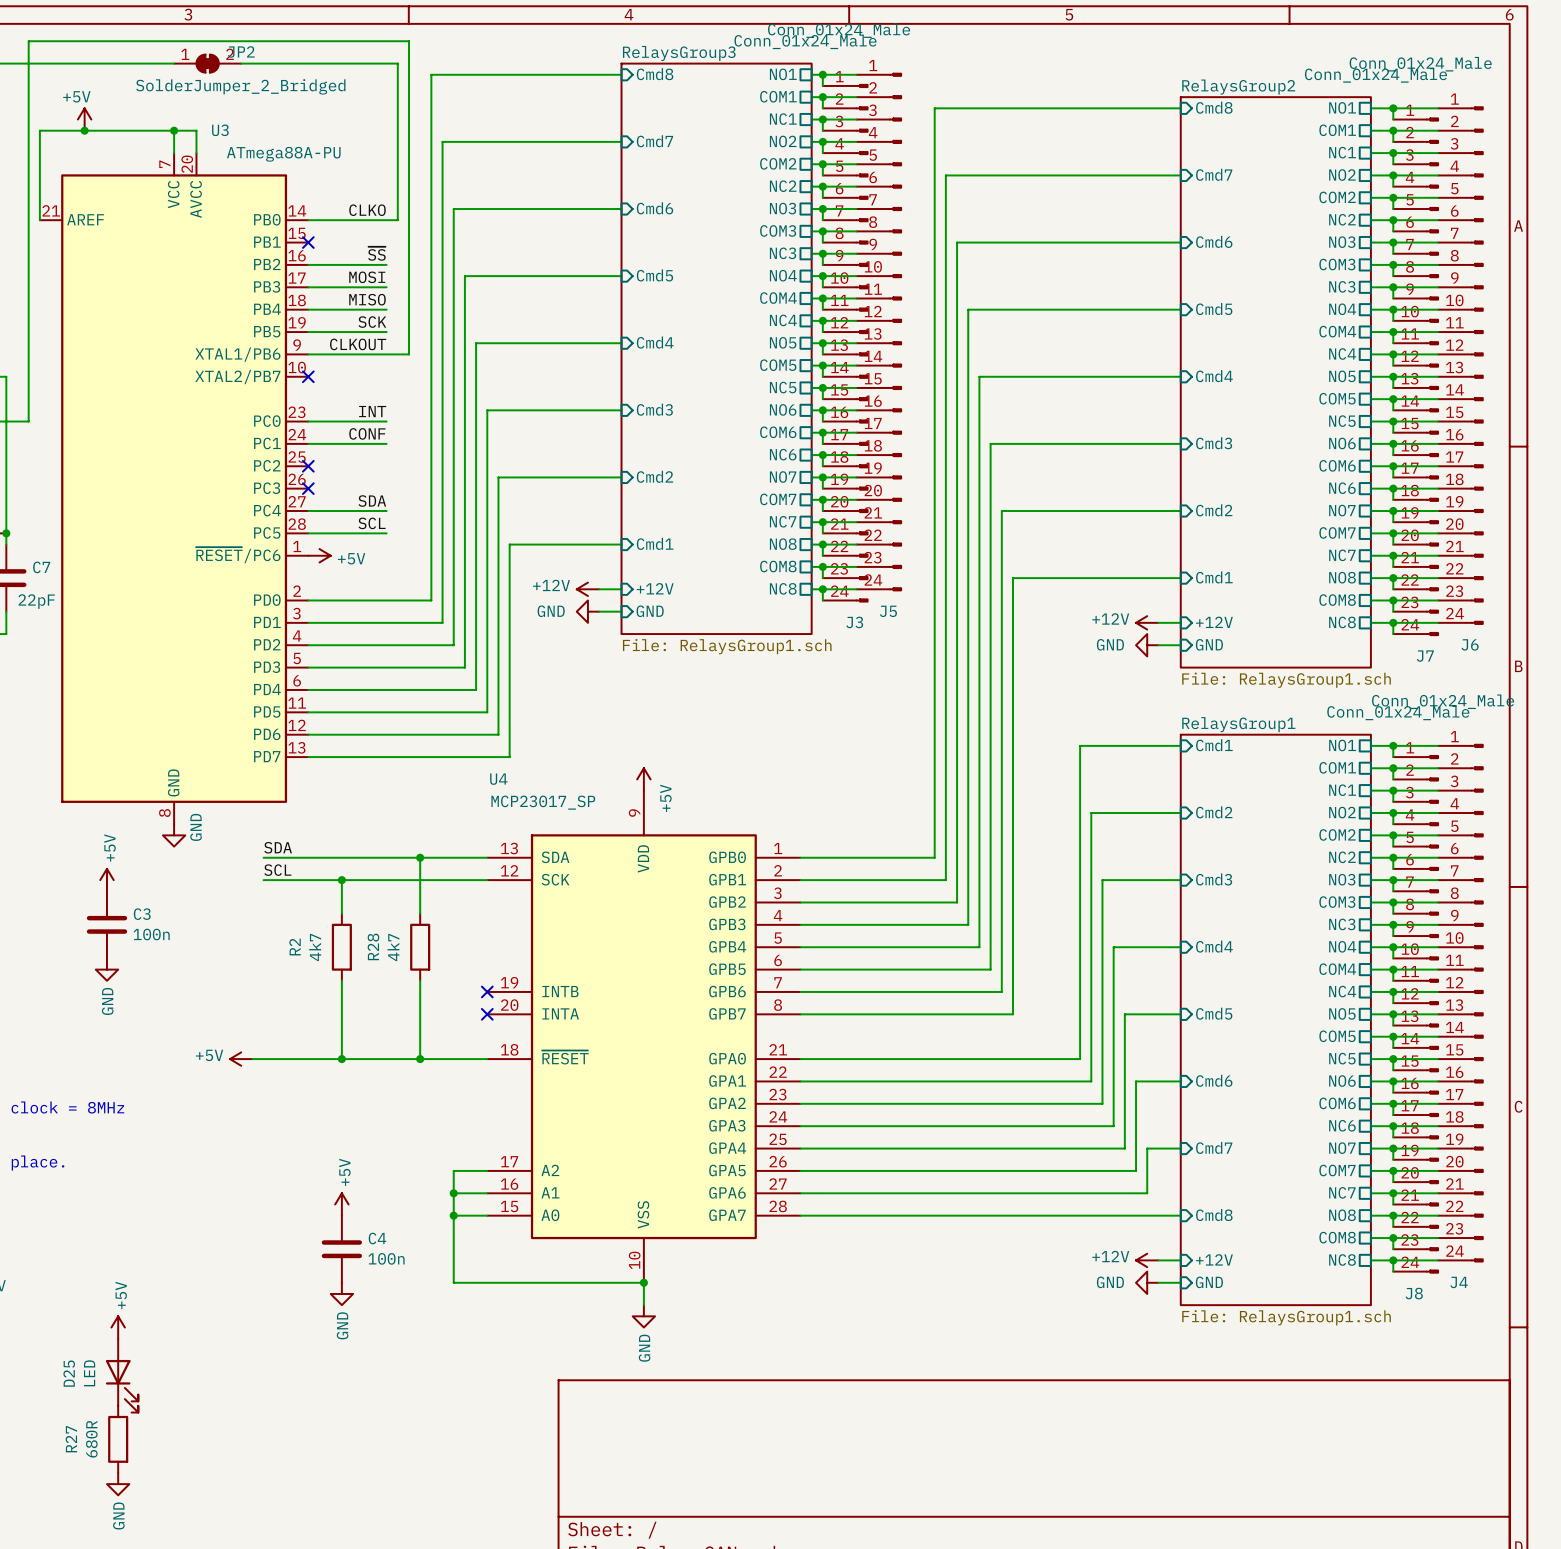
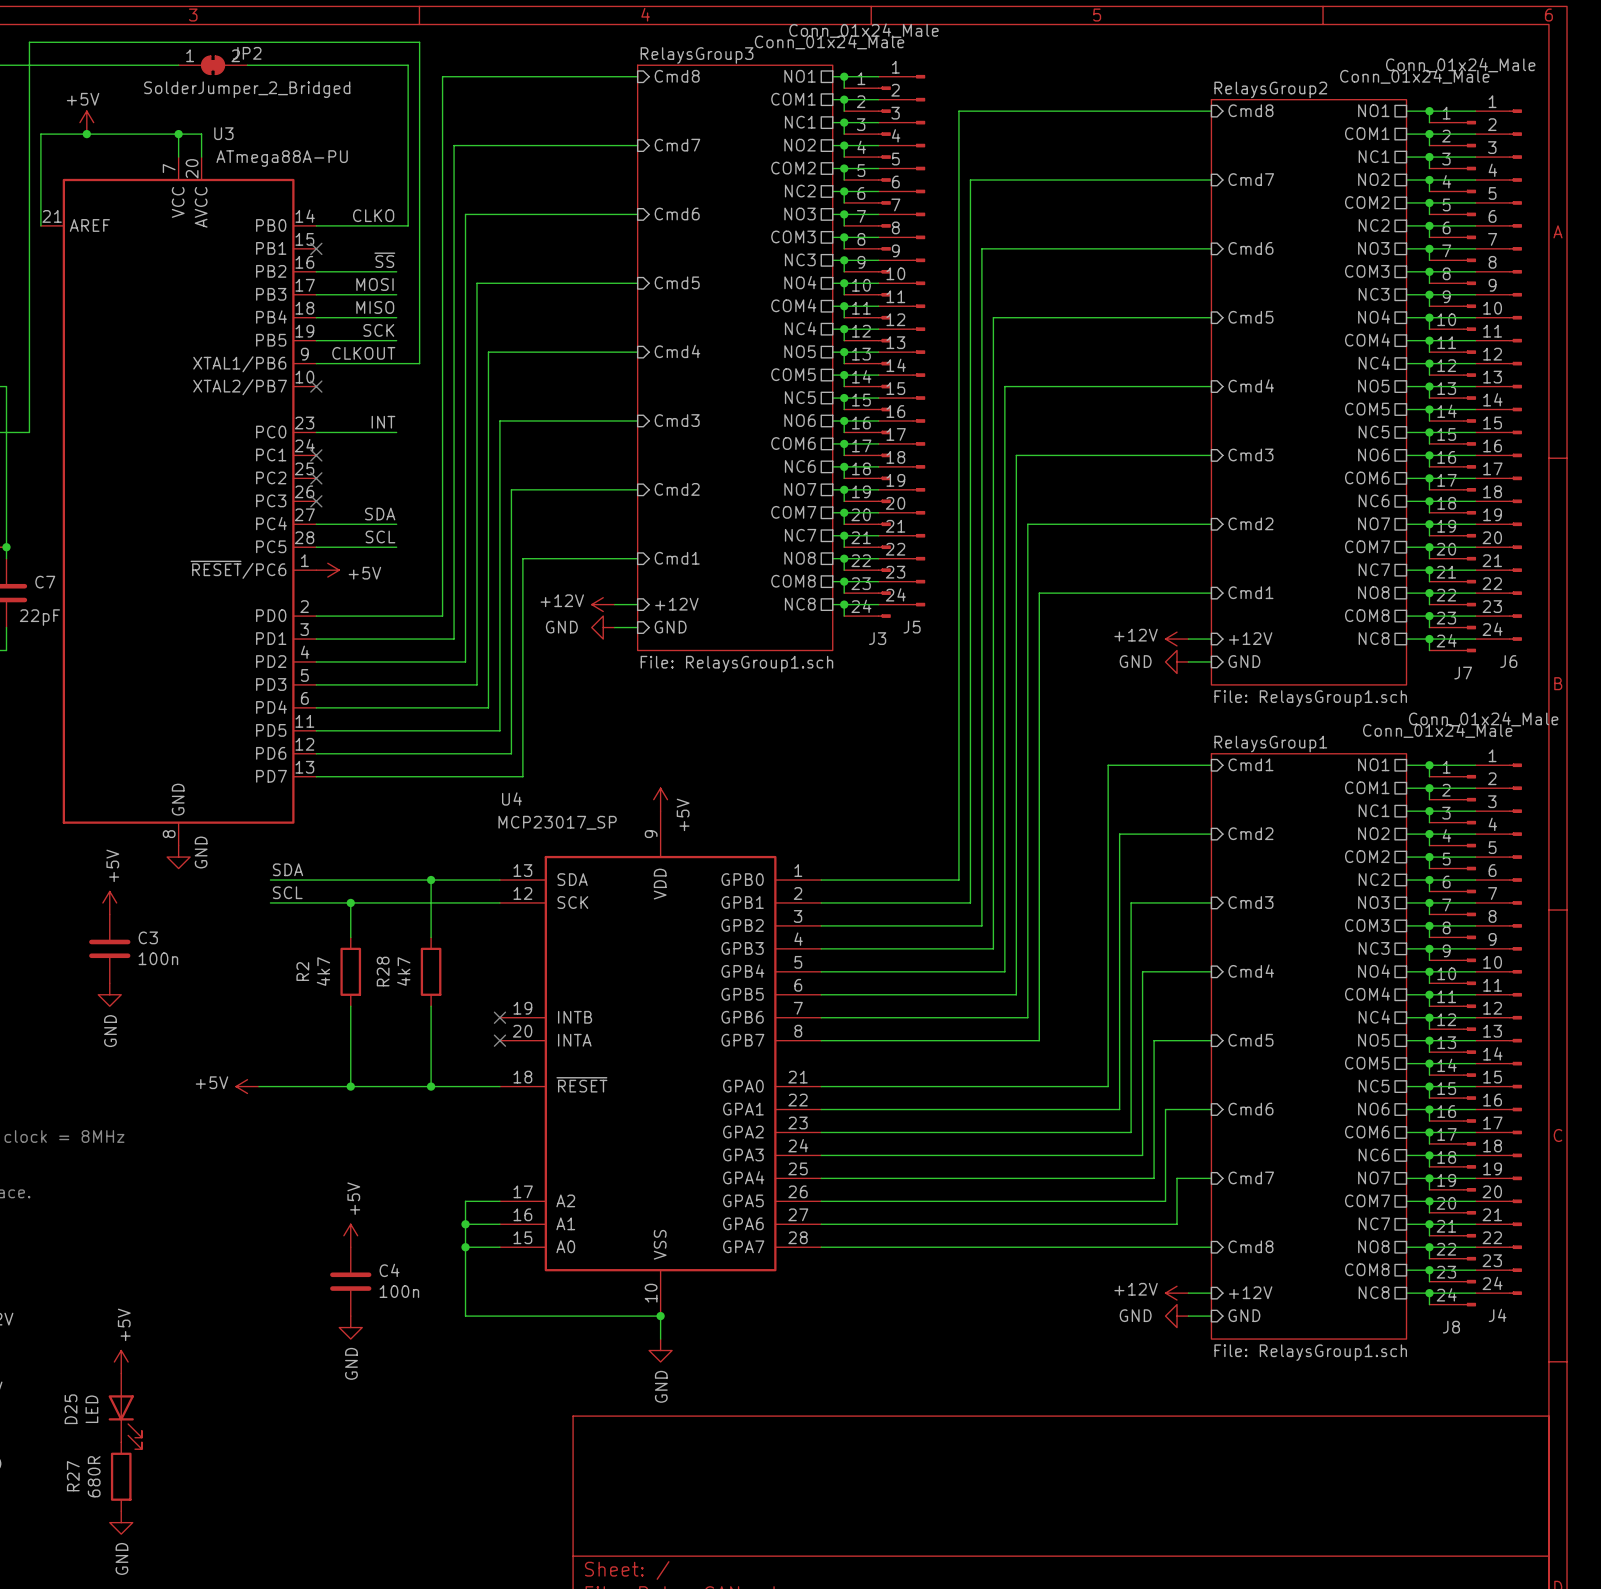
label: CONF (367, 433) -> none
wire: (308, 443) (386, 443) -> none
no-connect mark: none -> (316, 455)

